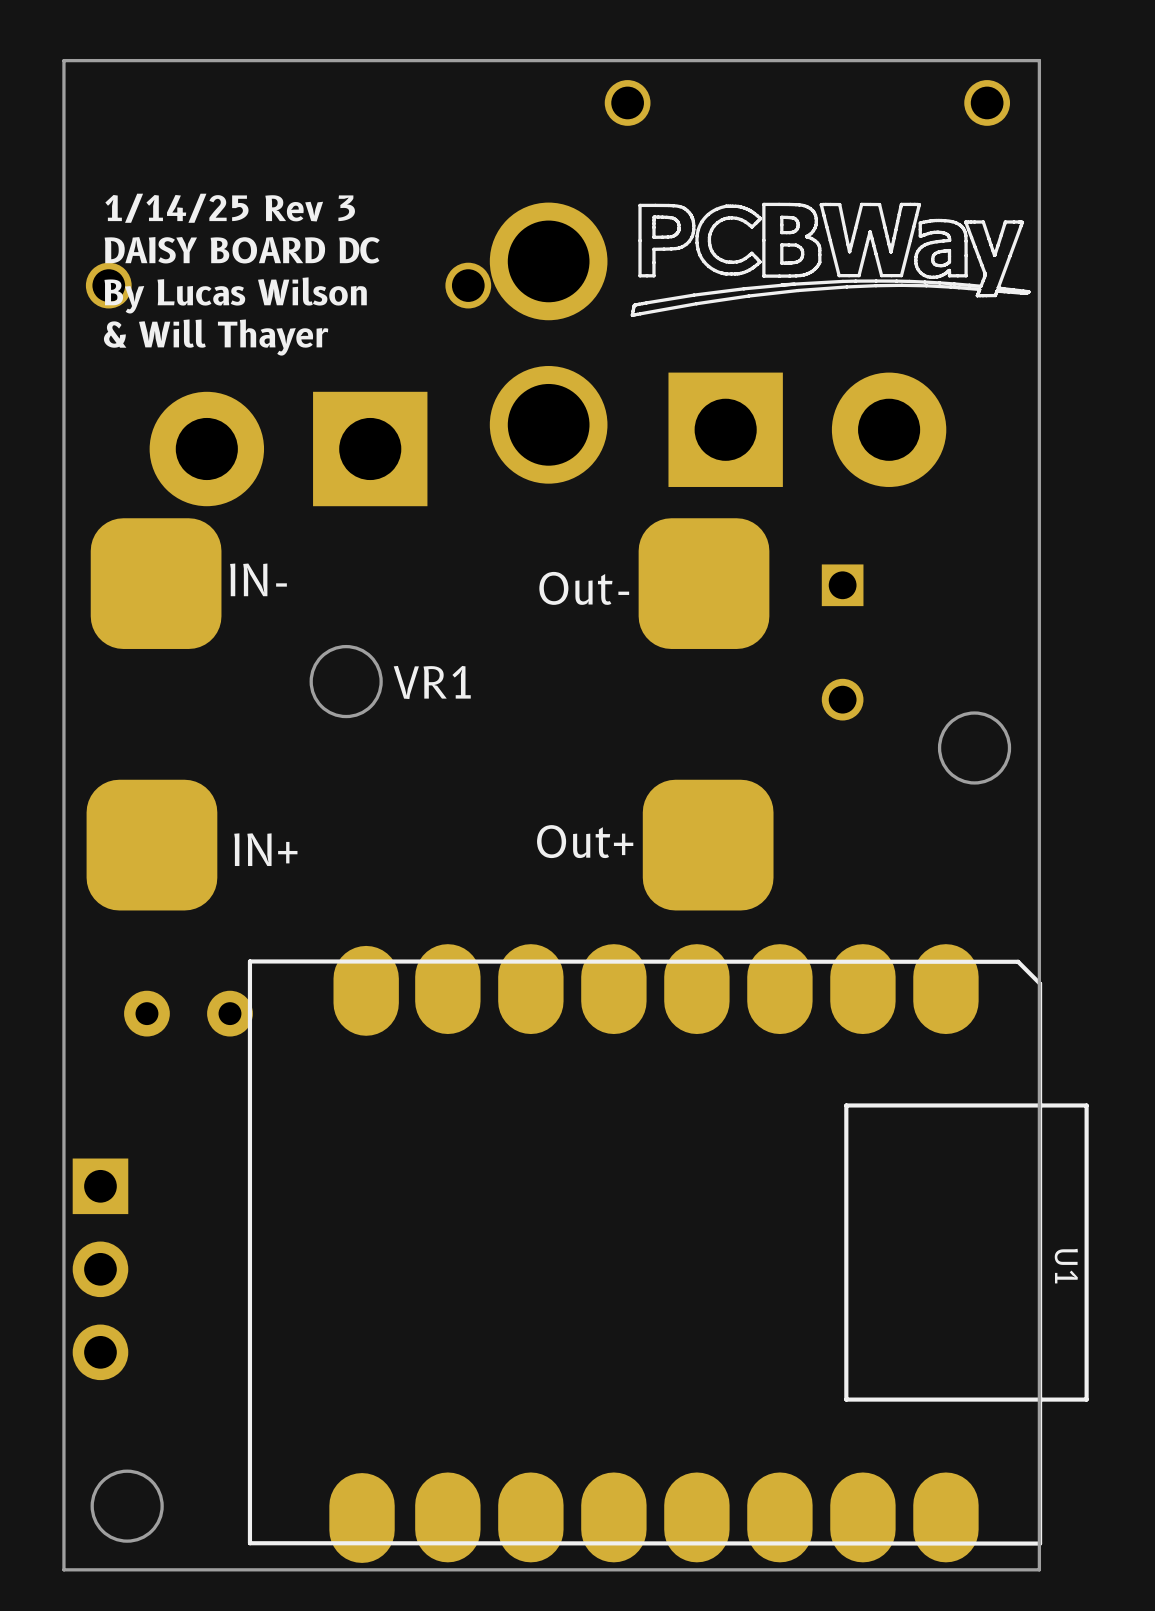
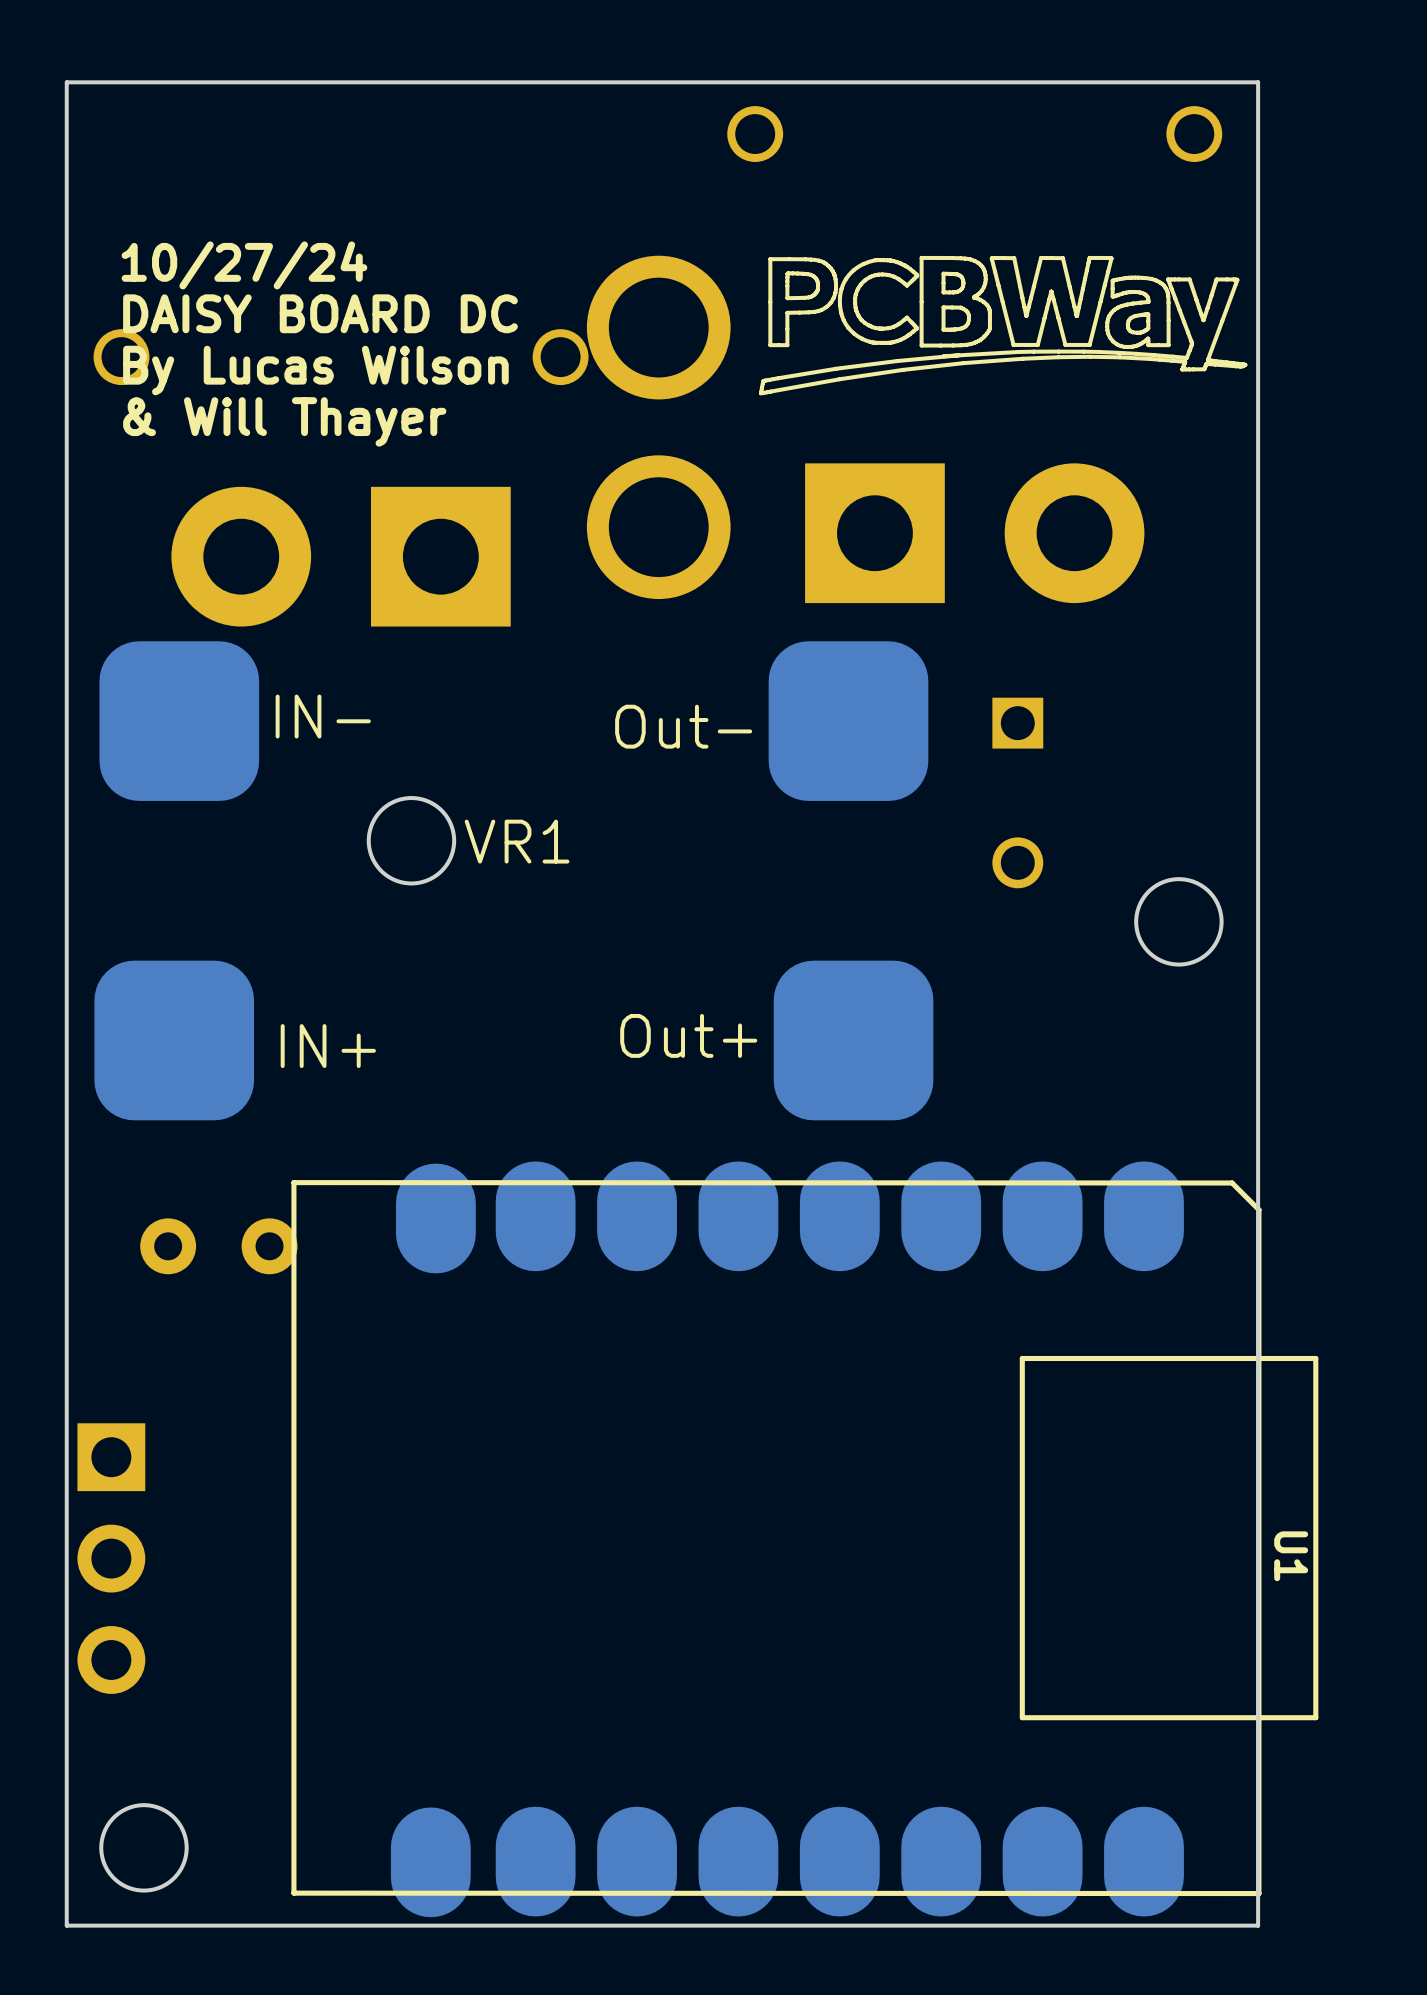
text: 1/14/25 Rev 3 (230, 208) -> 10/27/24 (244, 265)

